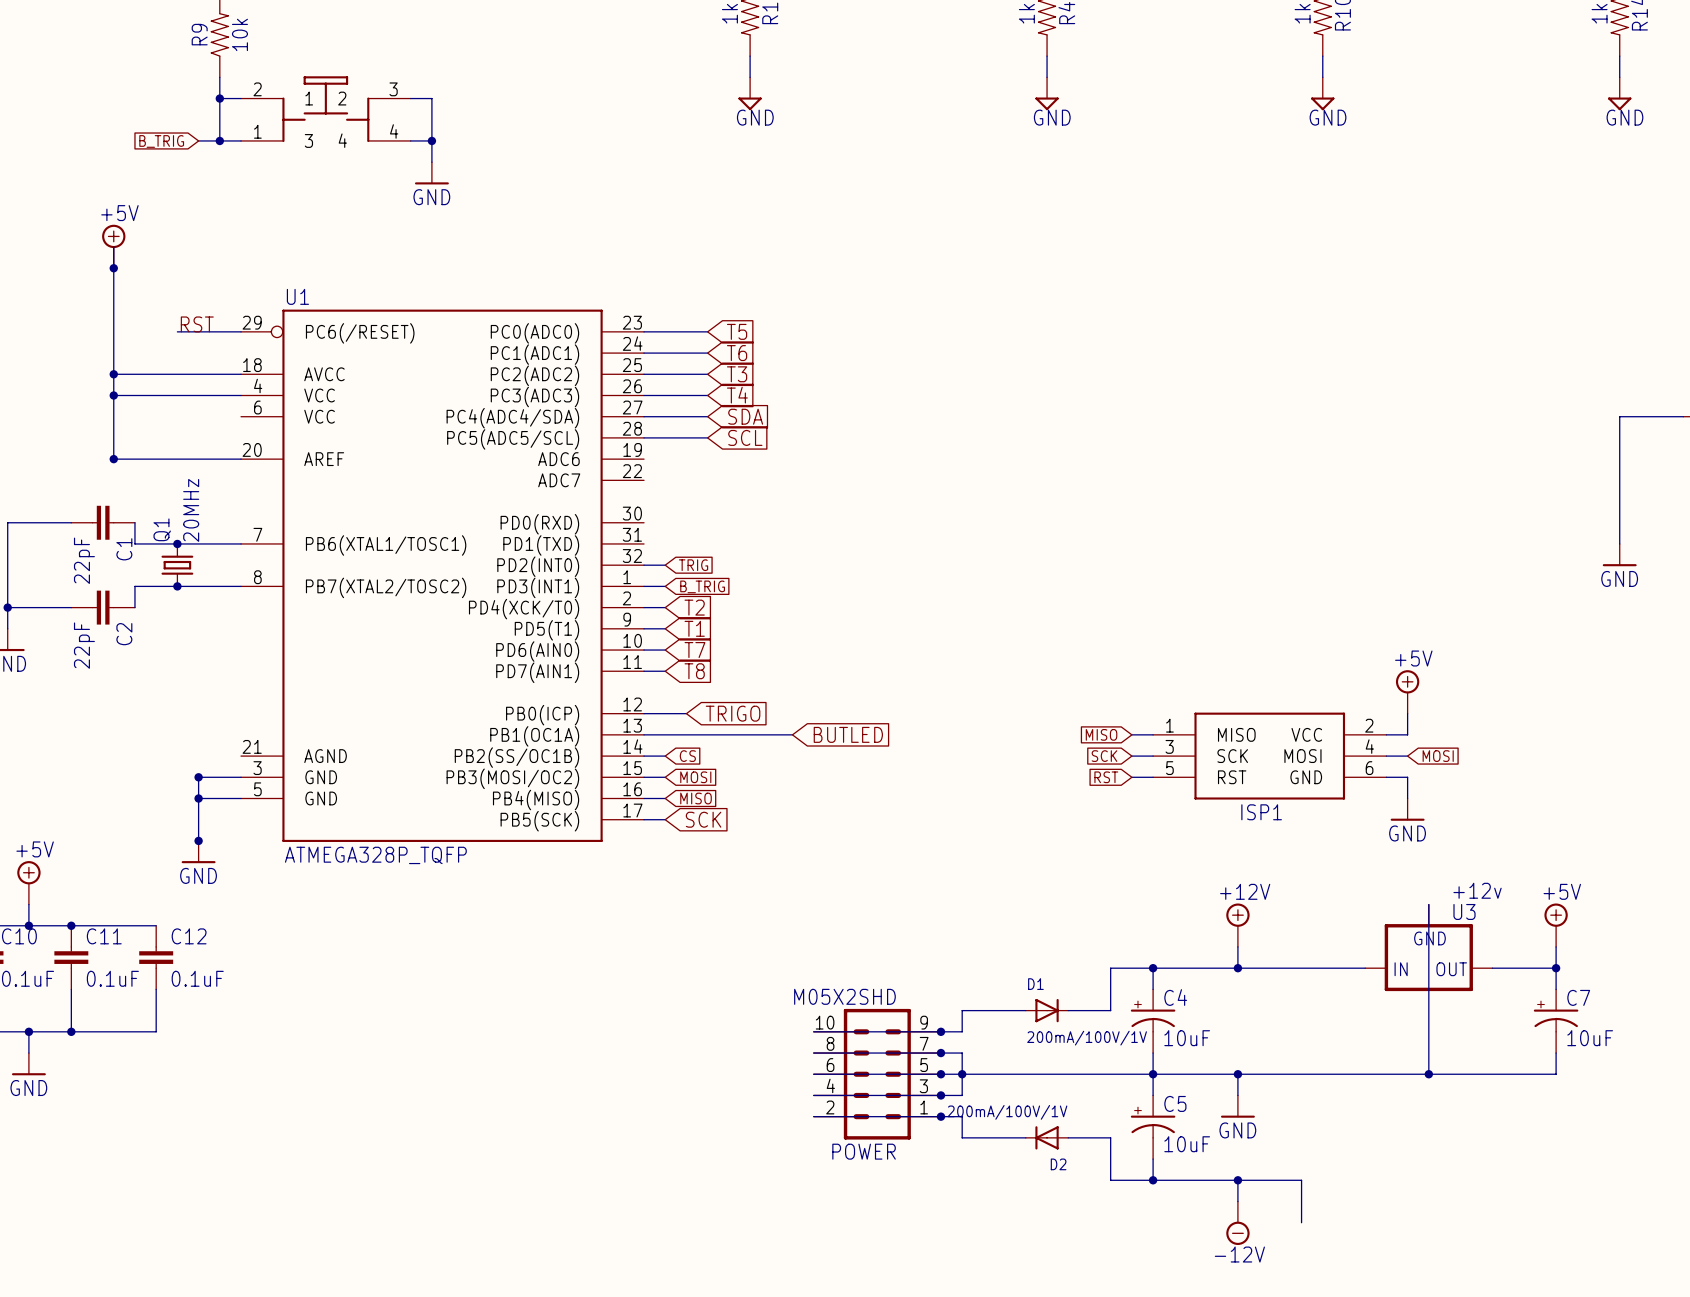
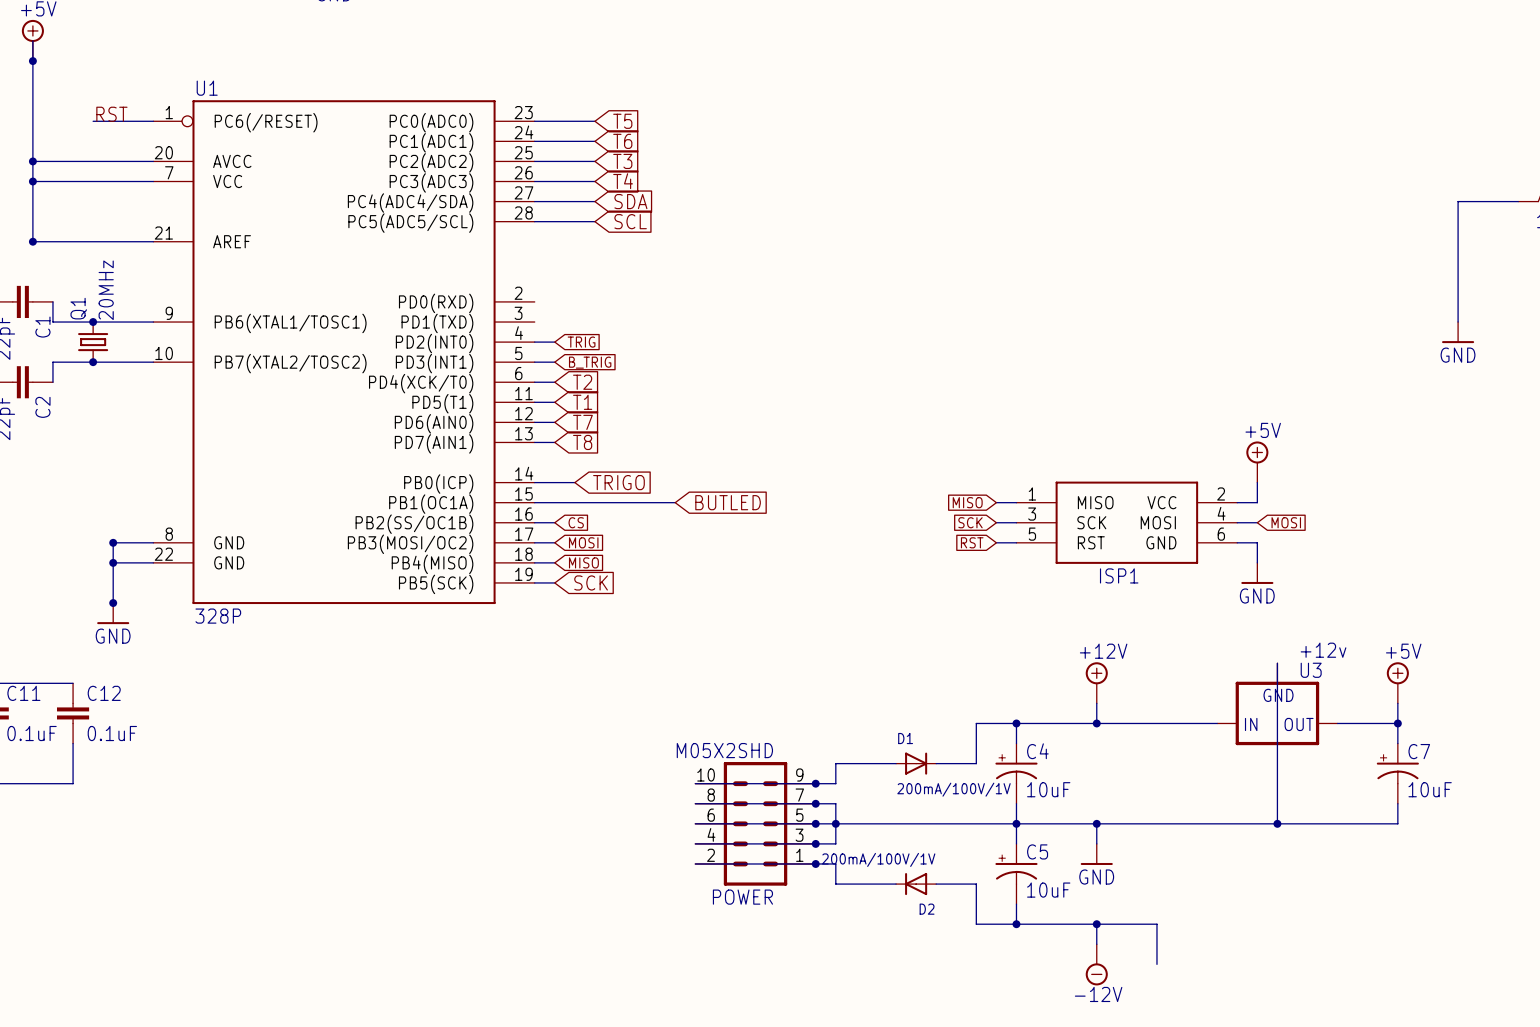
U1 symbol: [241, 309, 645, 842] -> [153, 100, 535, 605]
U1 value: ATMEGA328P_TQFP (375, 855) -> 328P (218, 616)

